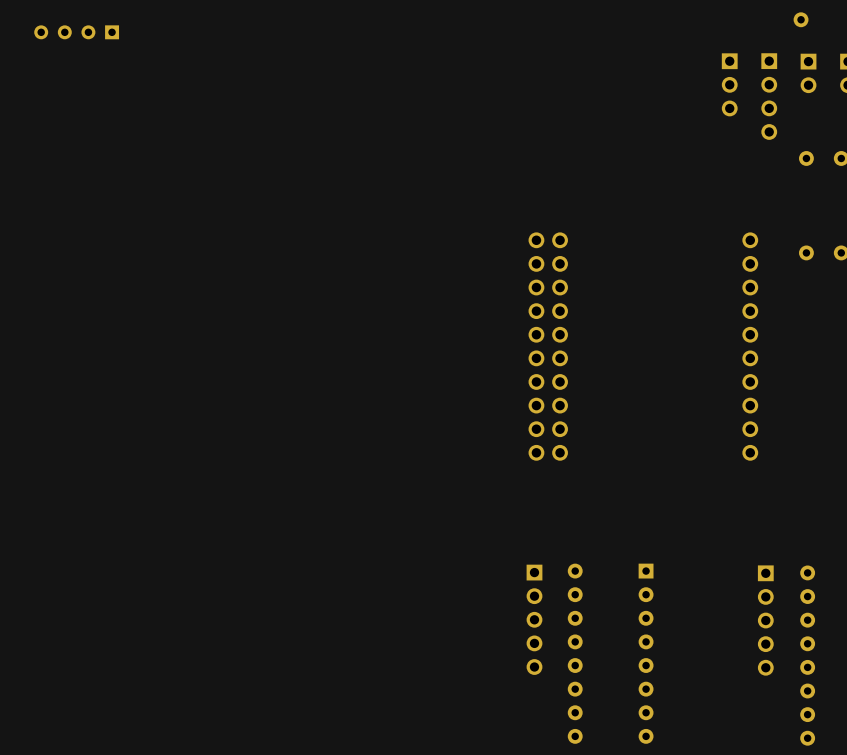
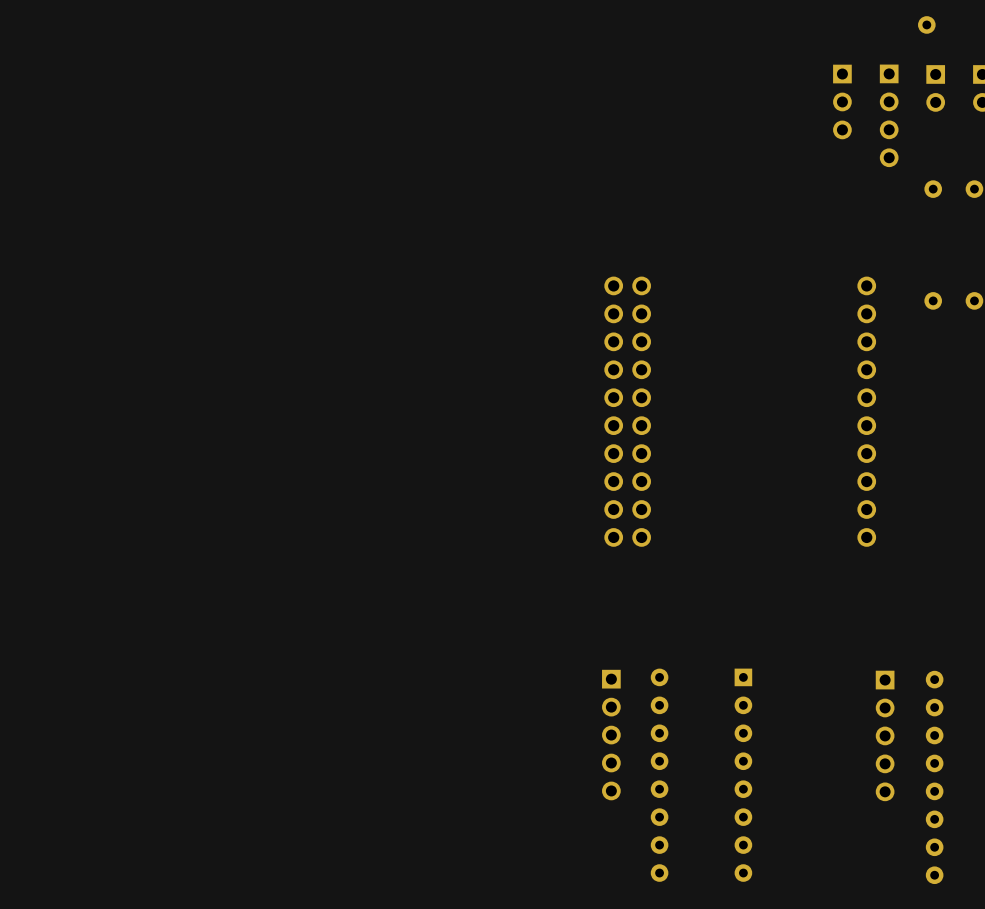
part: (76, 32) -> none

